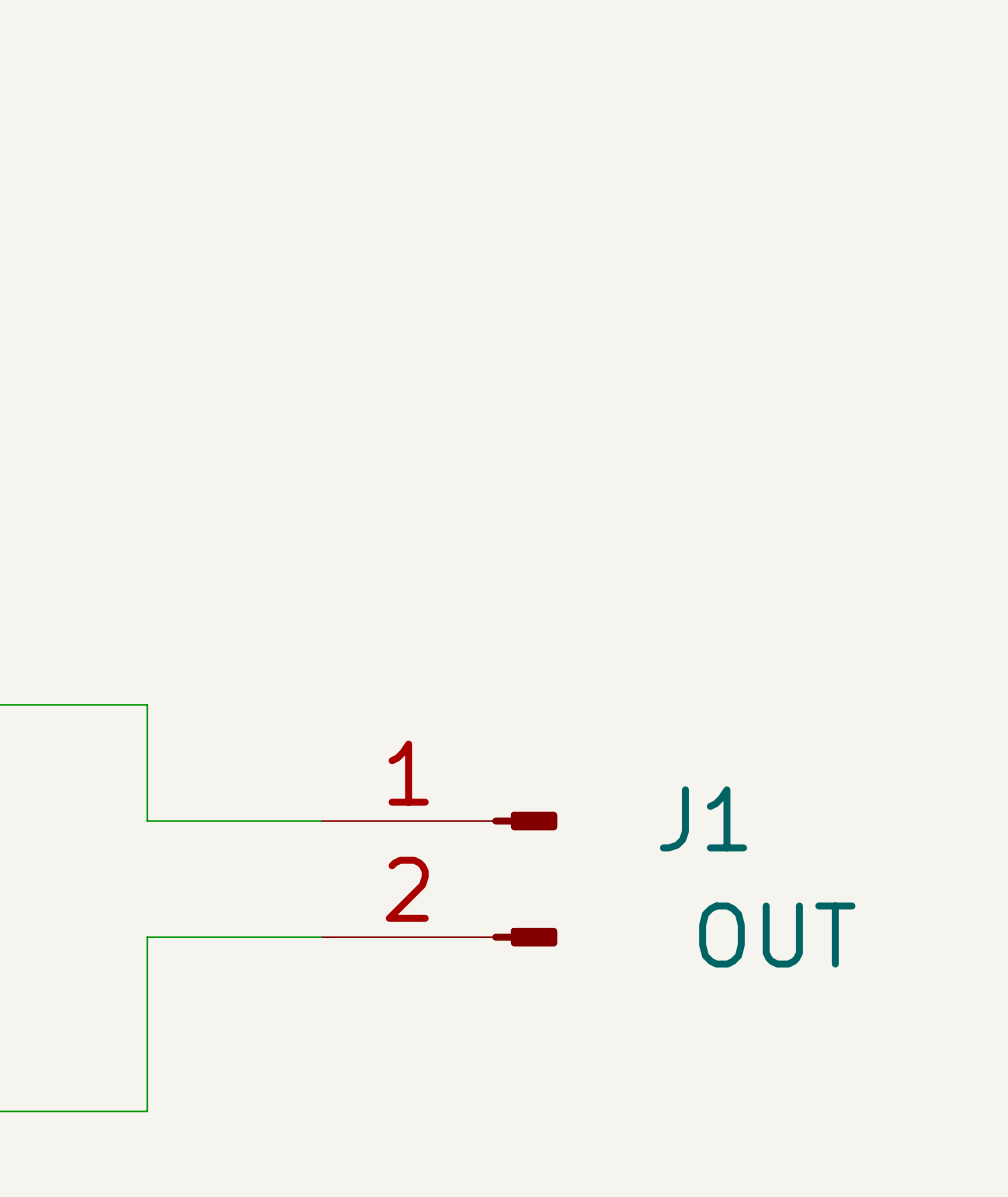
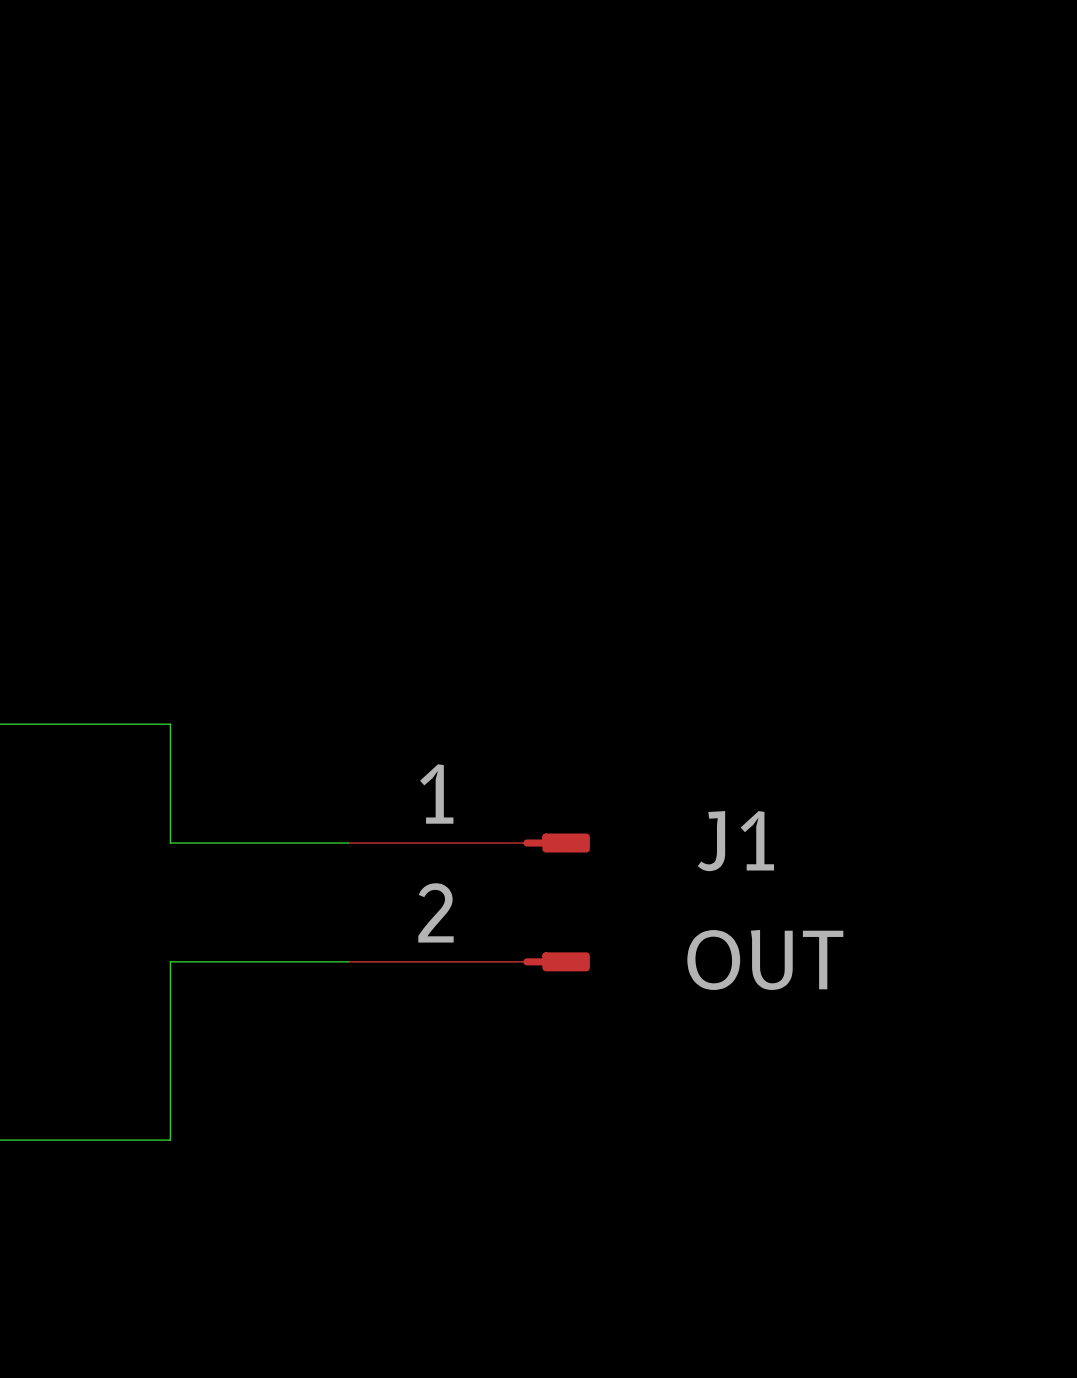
J1 value position: OUT (777, 935) -> OUT (765, 959)

